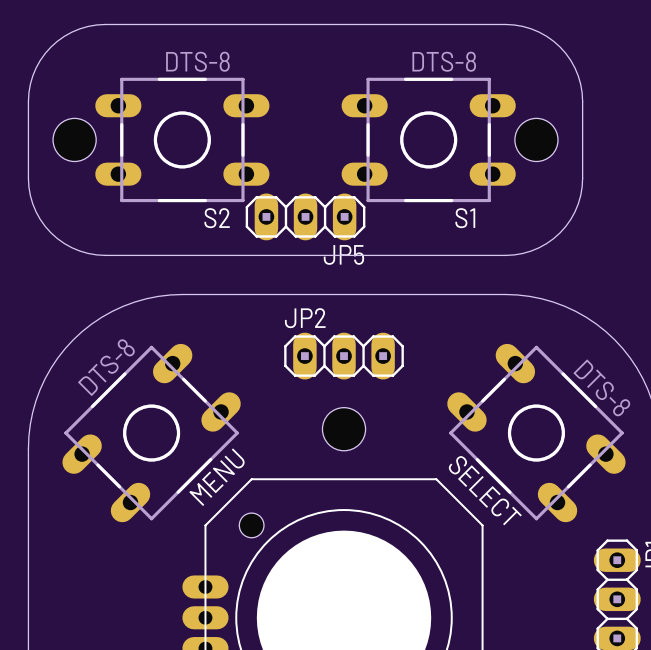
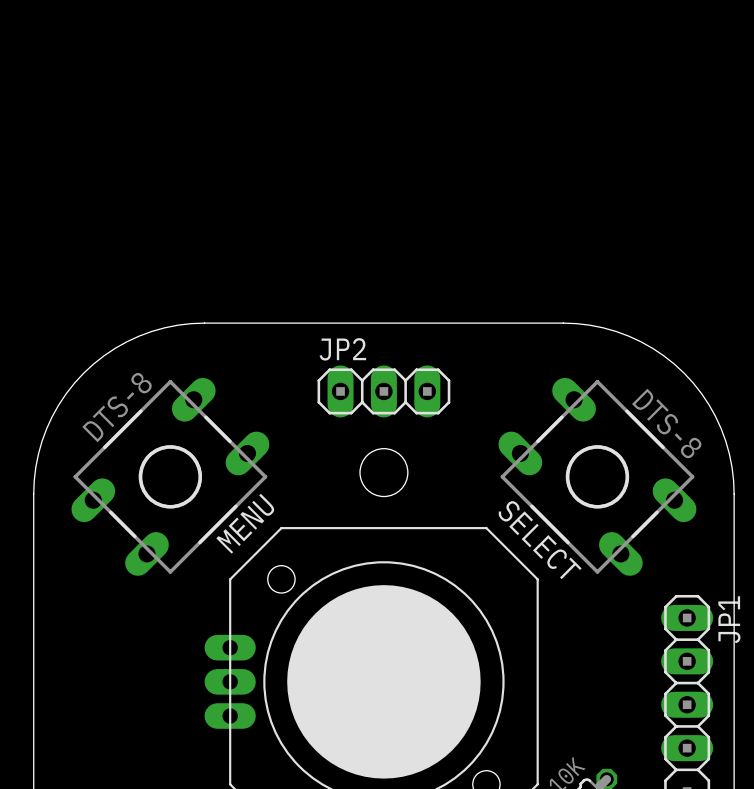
board edge: (105, 24) (505, 24) (531, 28) (553, 41) (565, 53) (575, 68) (580, 84) (582, 101) (582, 178) (578, 203) (565, 226) (553, 238) (531, 251) (514, 254) (105, 255) (79, 251) (64, 243) (50, 232) (40, 219) (32, 203) (28, 178) (28, 92) (32, 76) (40, 60) (57, 41) (79, 28) (105, 24) -> none
hole: (74, 139) -> none
S2: DTS-8 (182, 139) -> none
S1: DTS-8 (428, 139) -> none
hole: (536, 139) -> none
JP5: (305, 216) -> none

